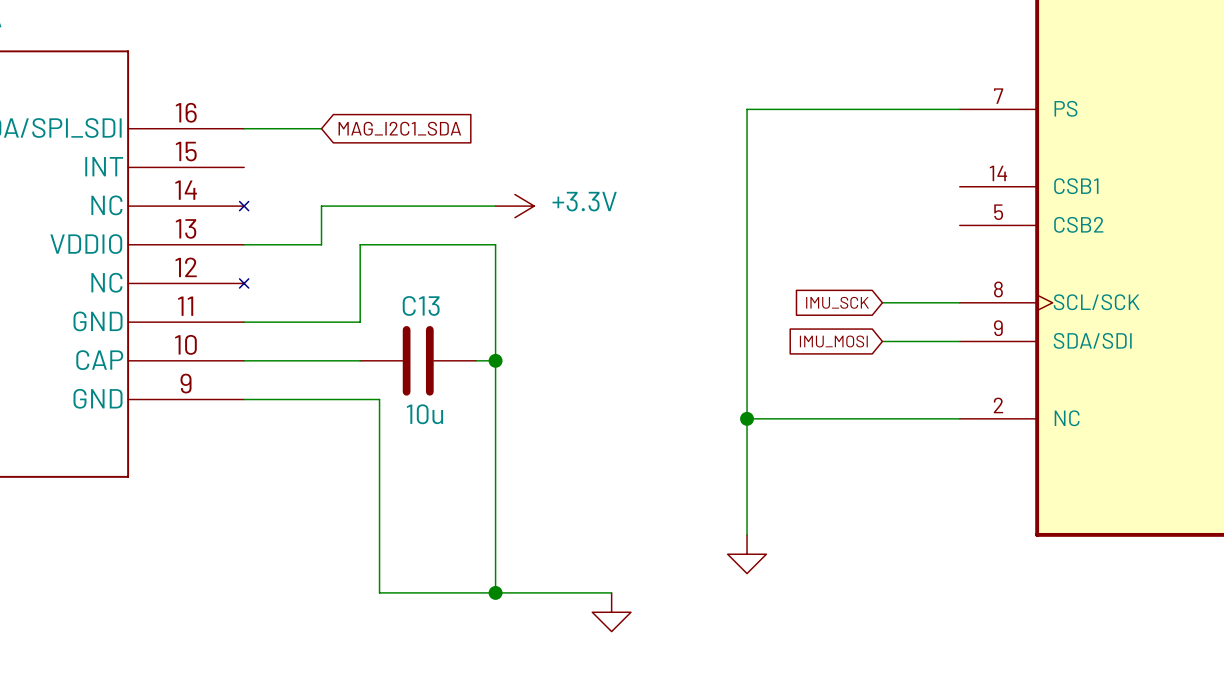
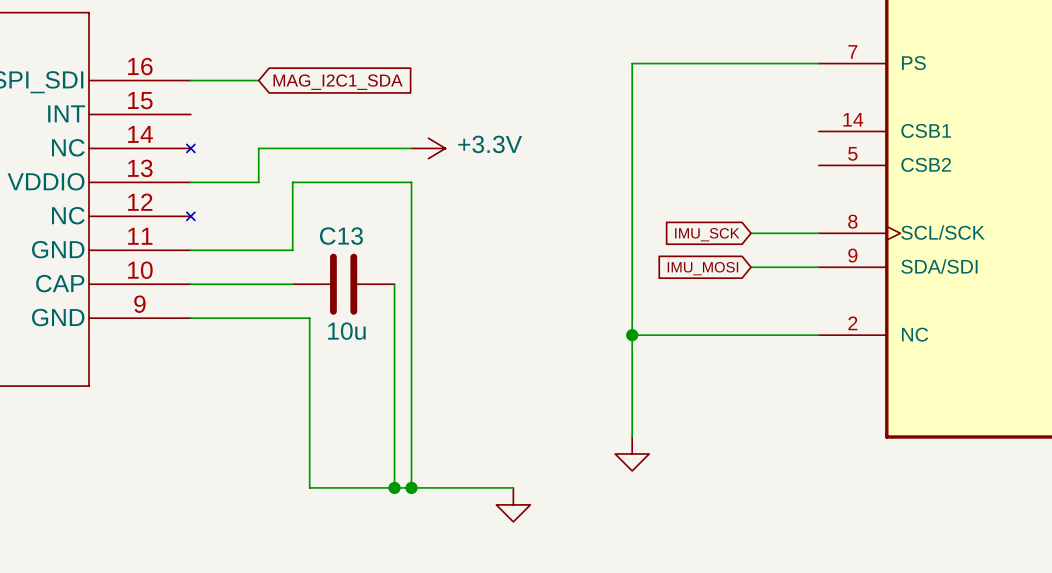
wire: (476, 360) (495, 360) -> (394, 284) (394, 487)
junction: (495, 360) -> none
junction: none -> (394, 487)

